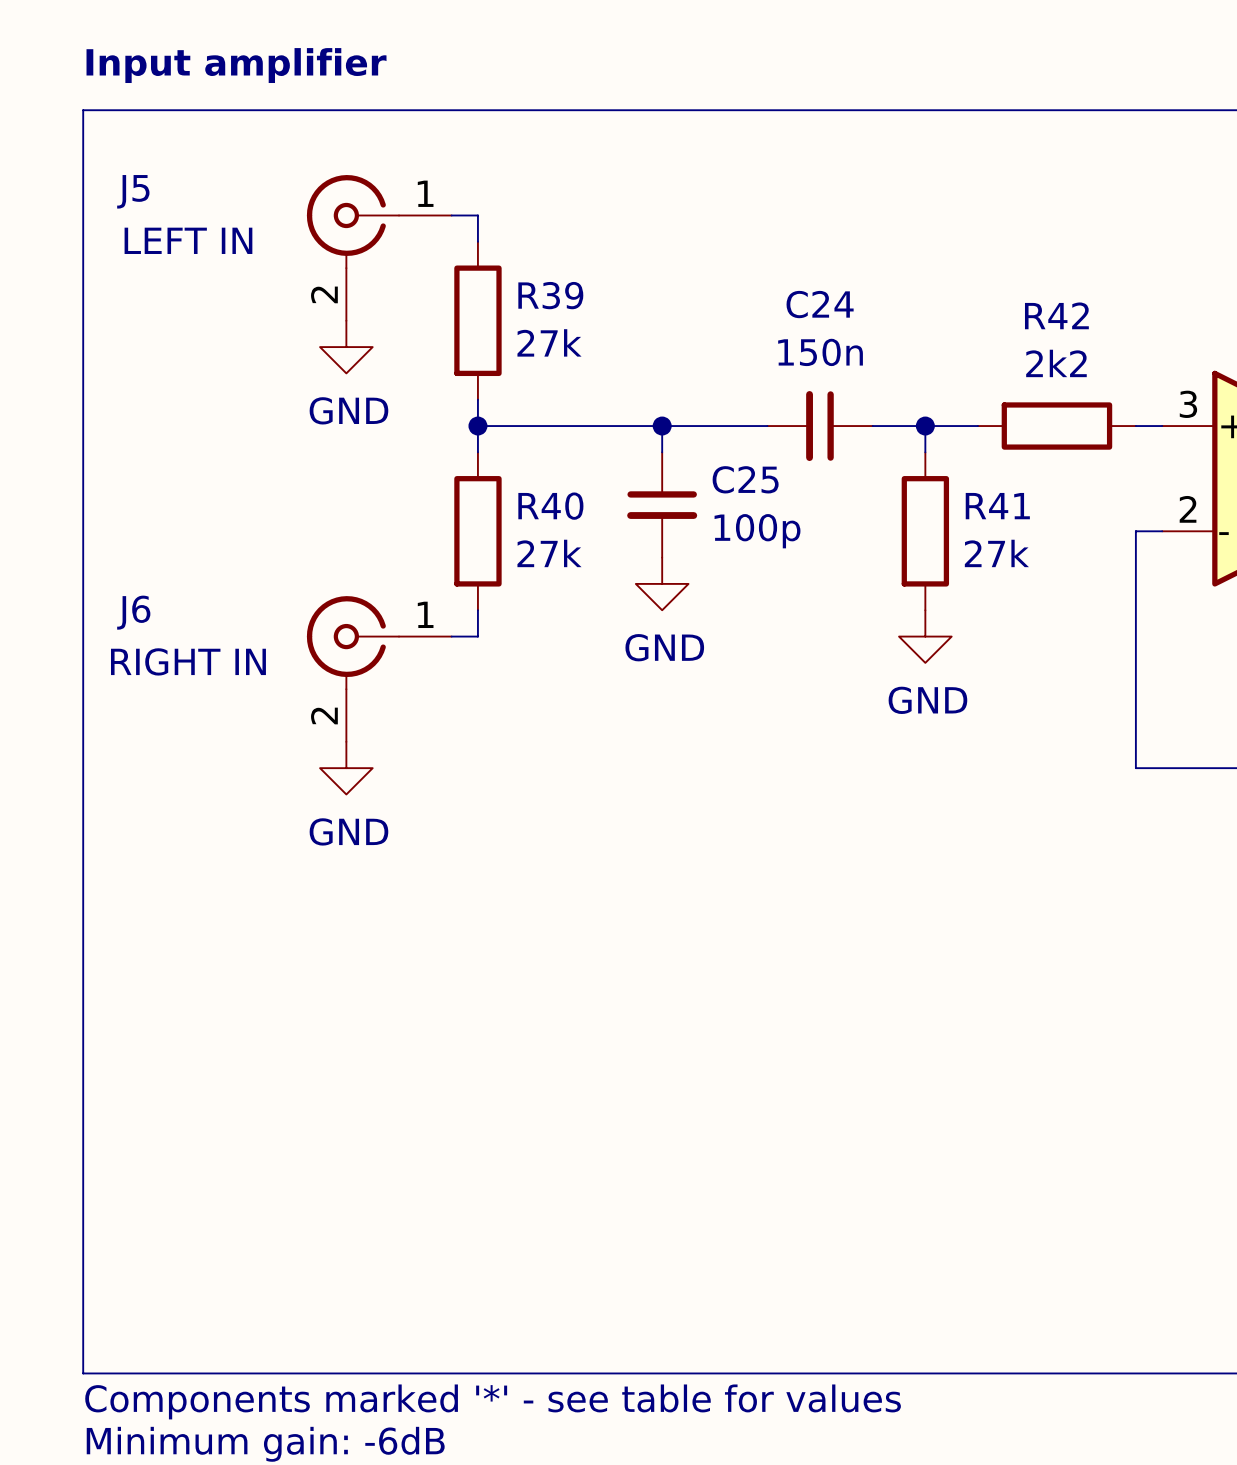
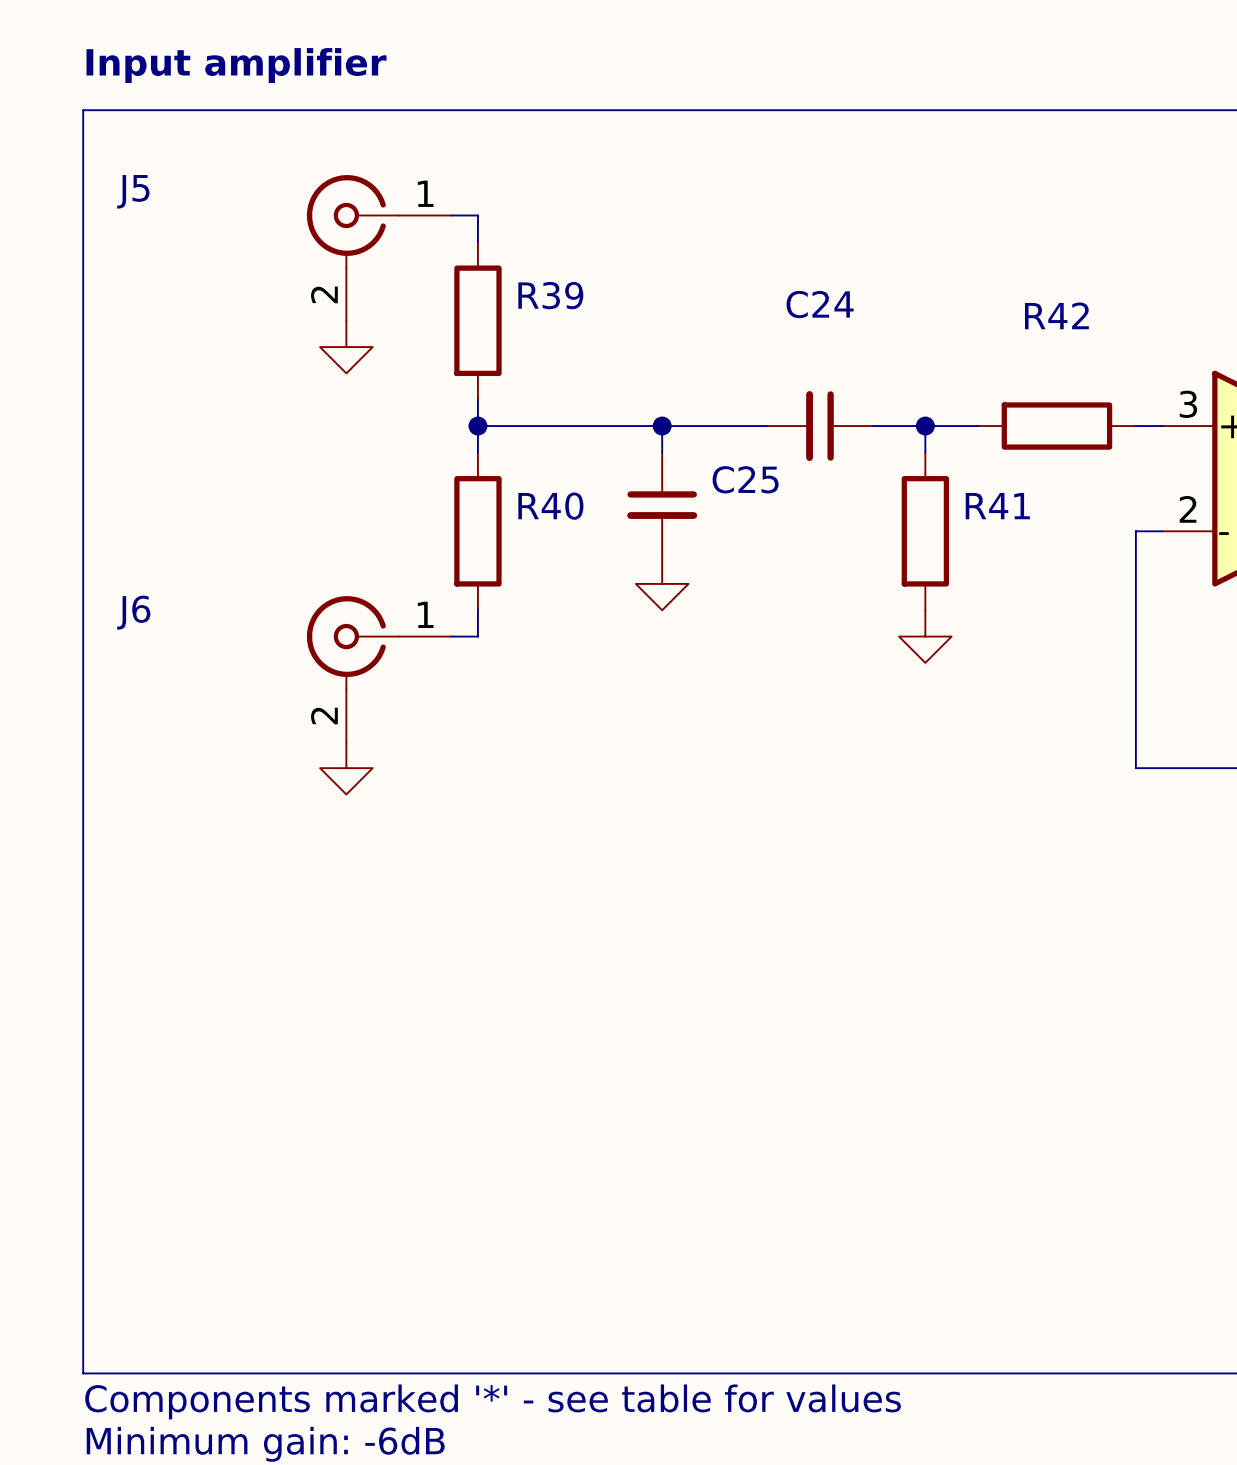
J5 value: LEFT IN (188, 240) -> none
R39 value: 27k (549, 342) -> none
C24 value: 150n (820, 352) -> none
R42 value: 2k2 (1056, 363) -> none
power symbol text: GND (348, 410) -> none
C25 value: 100p (757, 531) -> none
R40 value: 27k (549, 553) -> none
R41 value: 27k (996, 553) -> none
power symbol text: GND (664, 647) -> none
J6 value: RIGHT IN (188, 661) -> none
power symbol text: GND (927, 700) -> none
power symbol text: GND (348, 831) -> none

